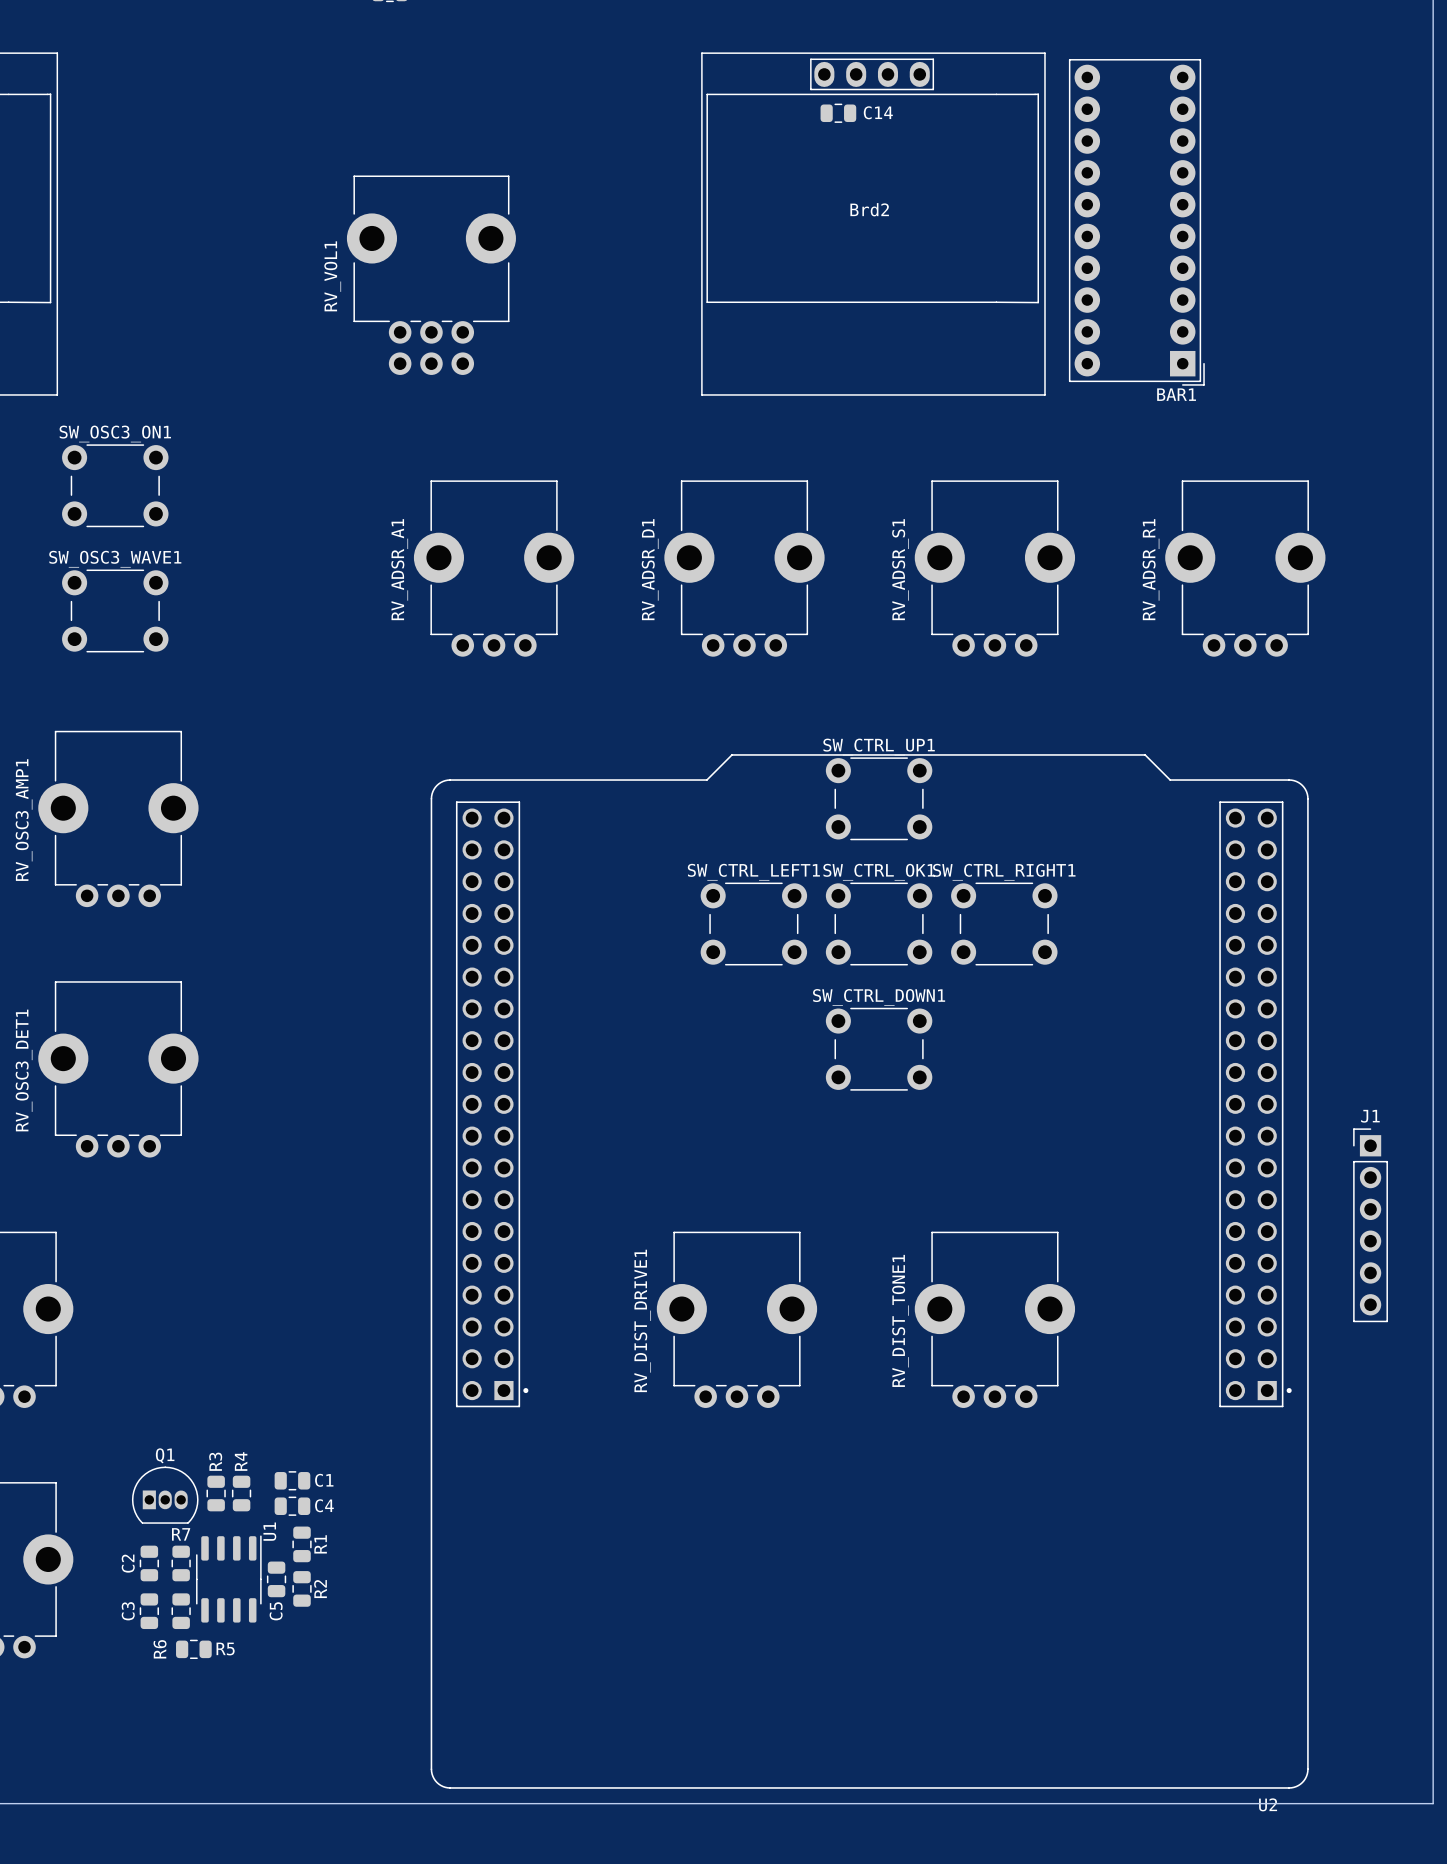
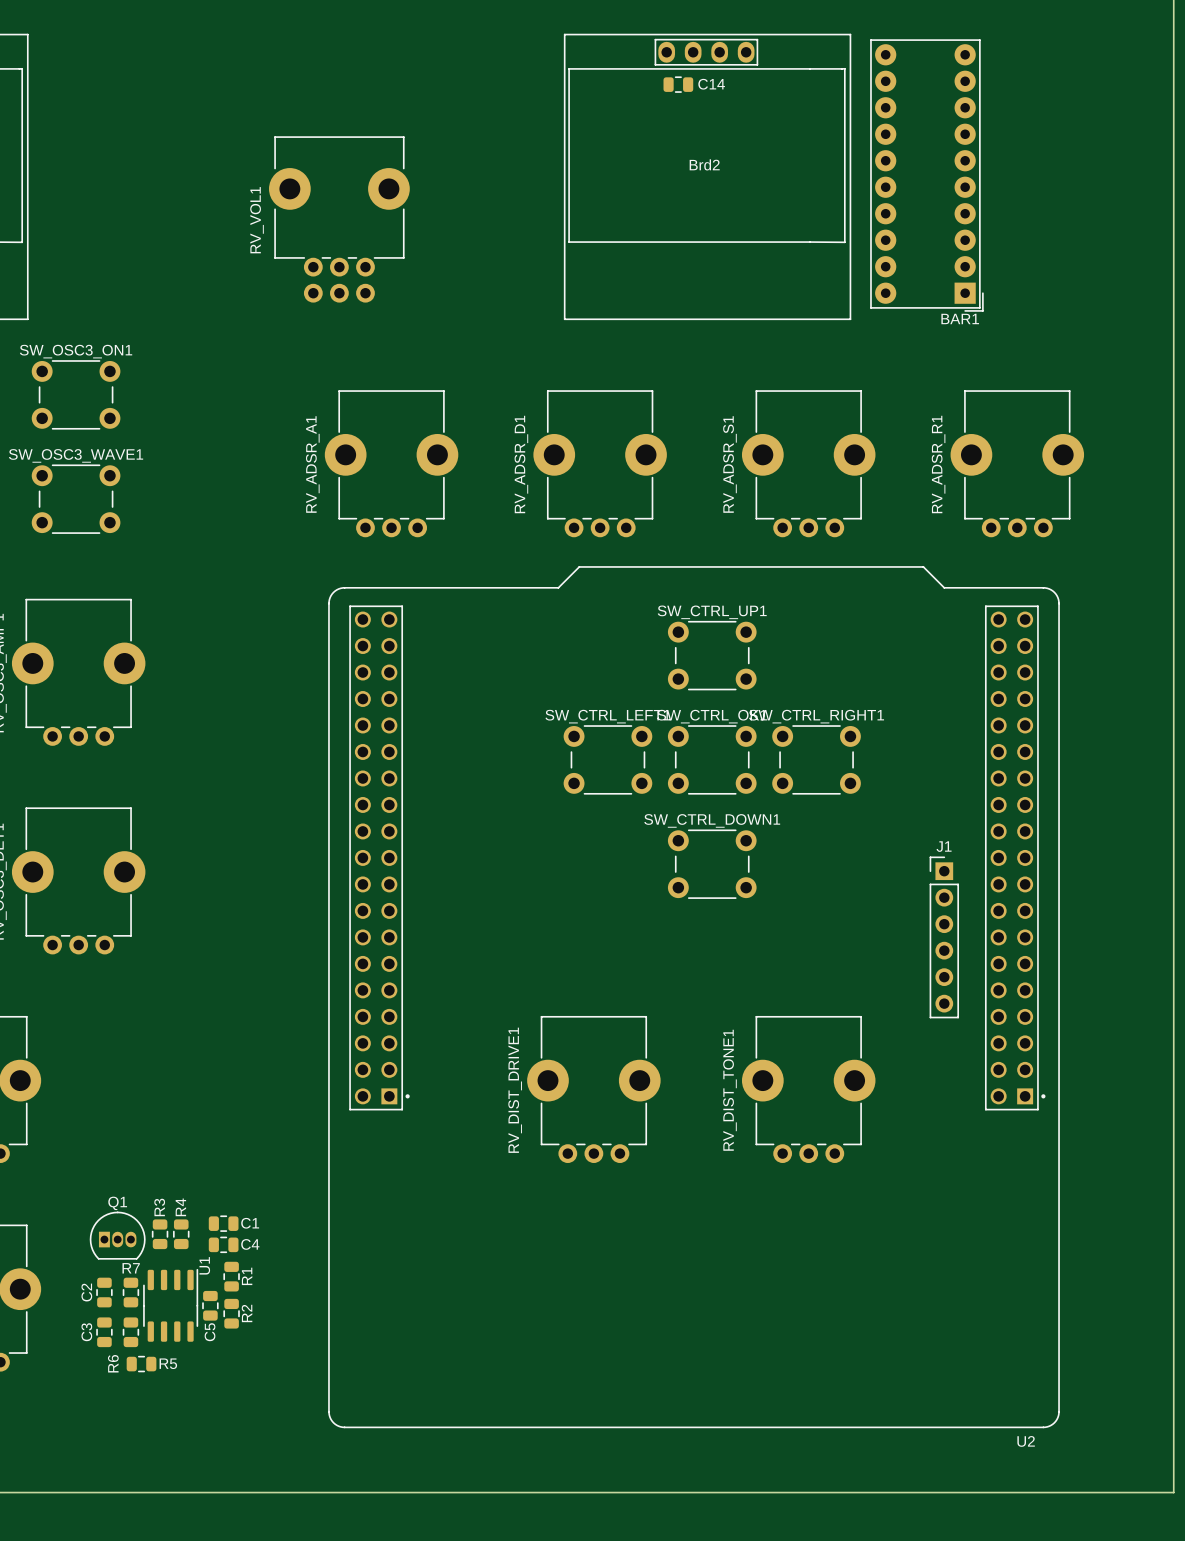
J1 position: (1370, 1225) -> (944, 937)
U2 position: (869, 1271) -> (694, 997)

